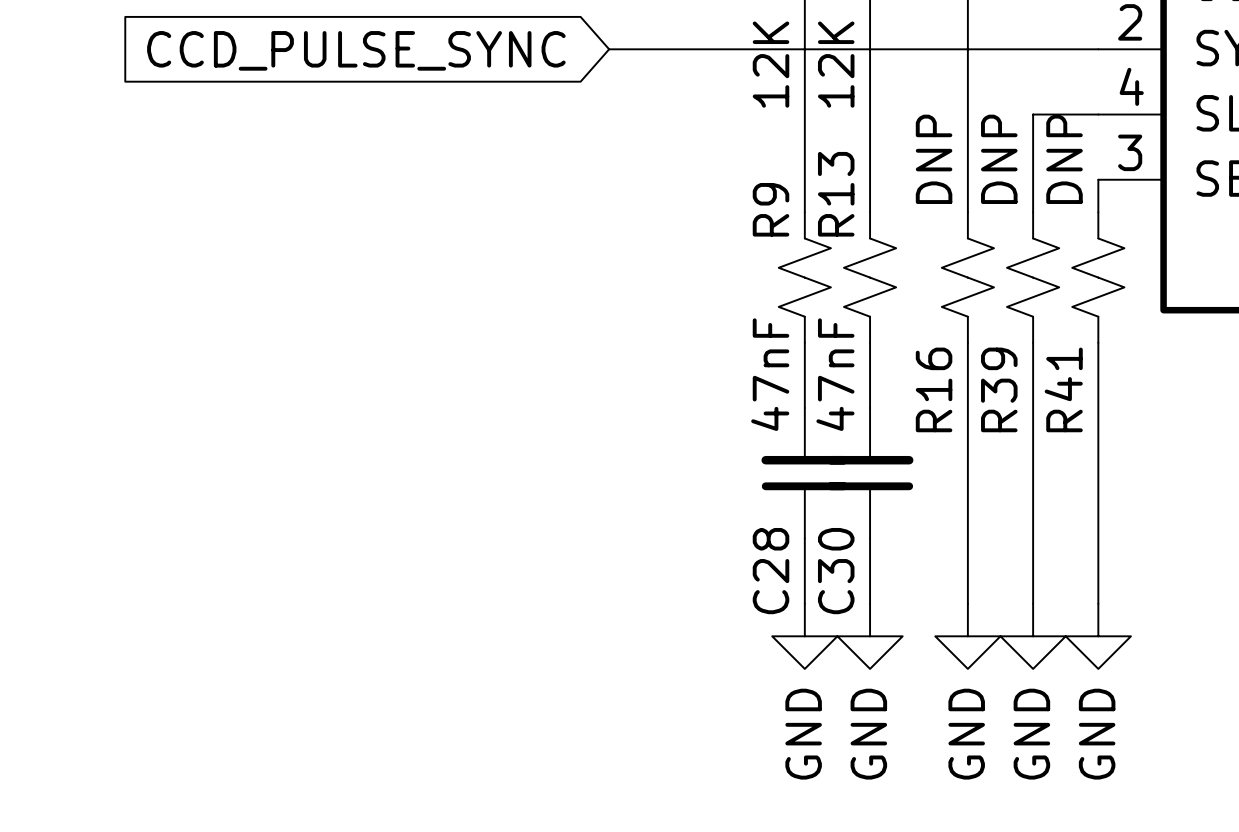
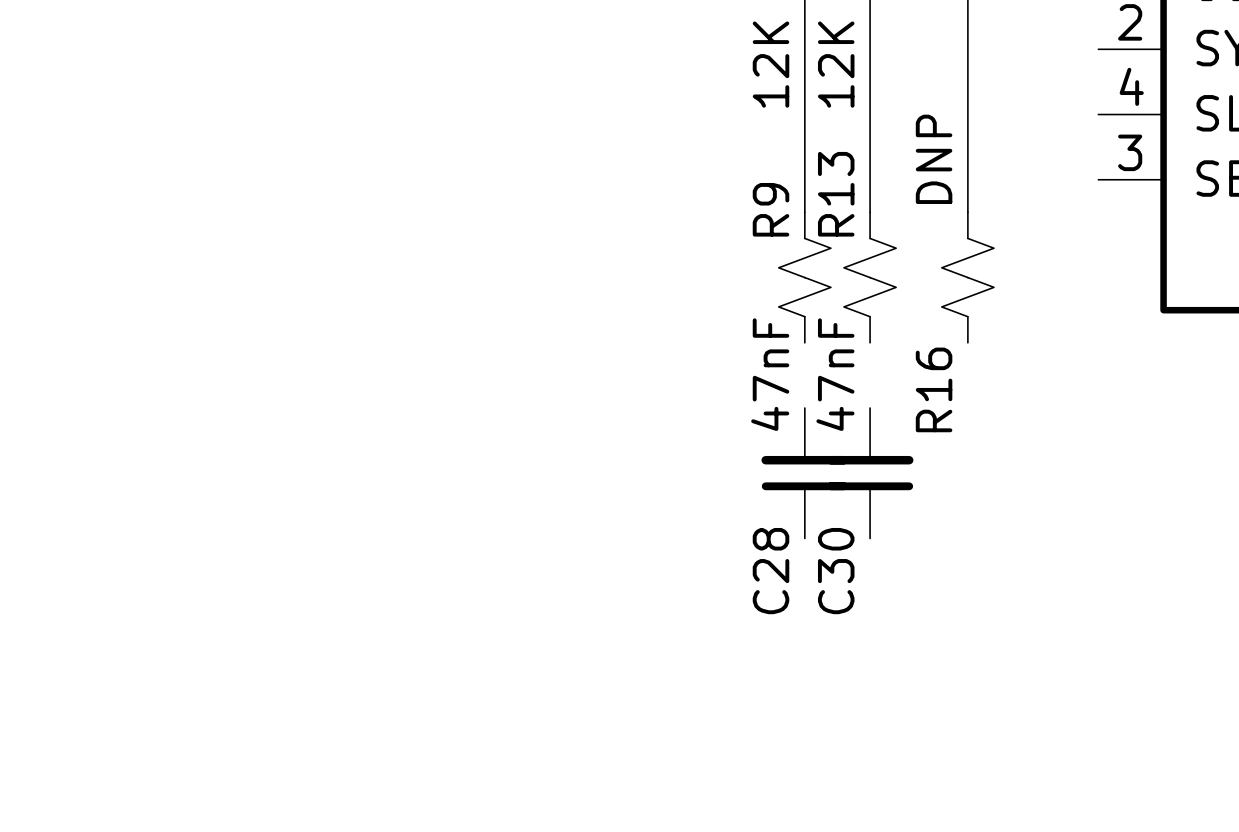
wire: (609, 49) (1098, 49) -> none
global label: CCD_PULSE_SYNC (356, 50) -> none
wire: (1098, 114) (1033, 114) (1033, 212) -> none
wire: (1098, 179) (1098, 212) -> none
R39: DNP (1033, 277) -> none
R41: DNP (1098, 277) -> none
wire: (804, 342) (804, 408) -> none
wire: (870, 342) (870, 408) -> none
wire: (967, 342) (967, 603) -> none
wire: (1033, 342) (1033, 603) -> none
wire: (1098, 342) (1098, 603) -> none
wire: (804, 538) (804, 603) -> none
wire: (870, 538) (870, 603) -> none
power symbol: GND (804, 636) -> none
power symbol: GND (870, 636) -> none
power symbol: GND (967, 636) -> none
power symbol: GND (1033, 636) -> none
power symbol: GND (1098, 636) -> none

